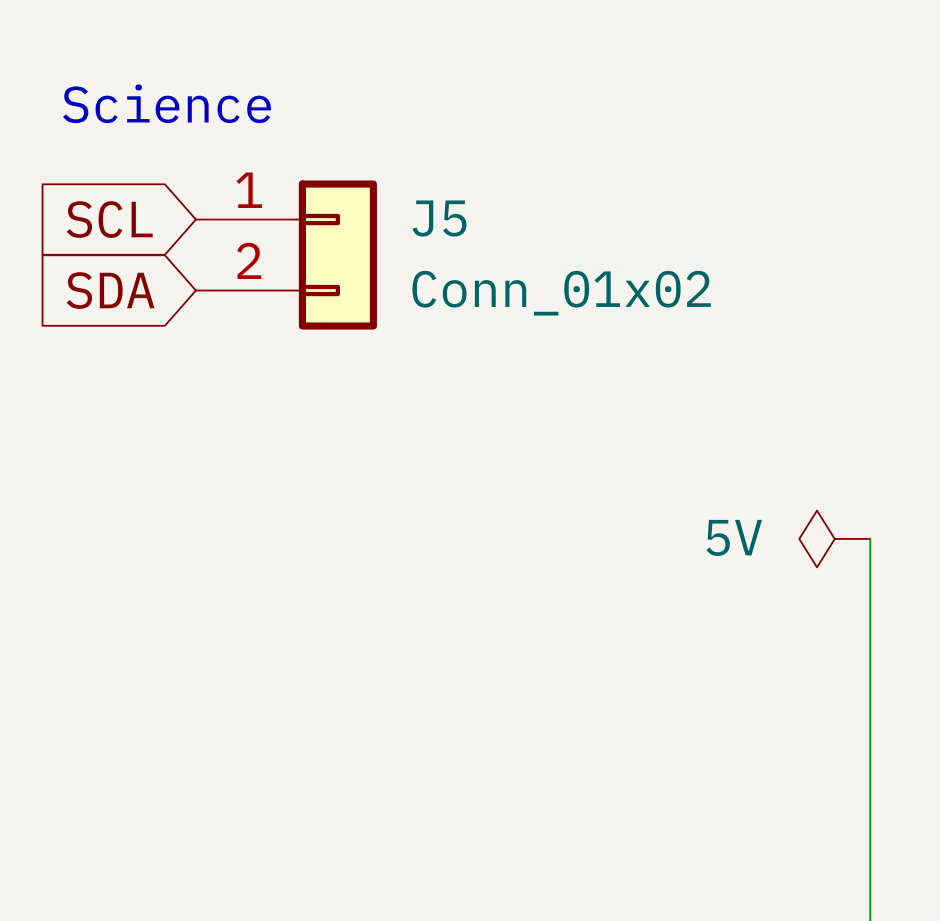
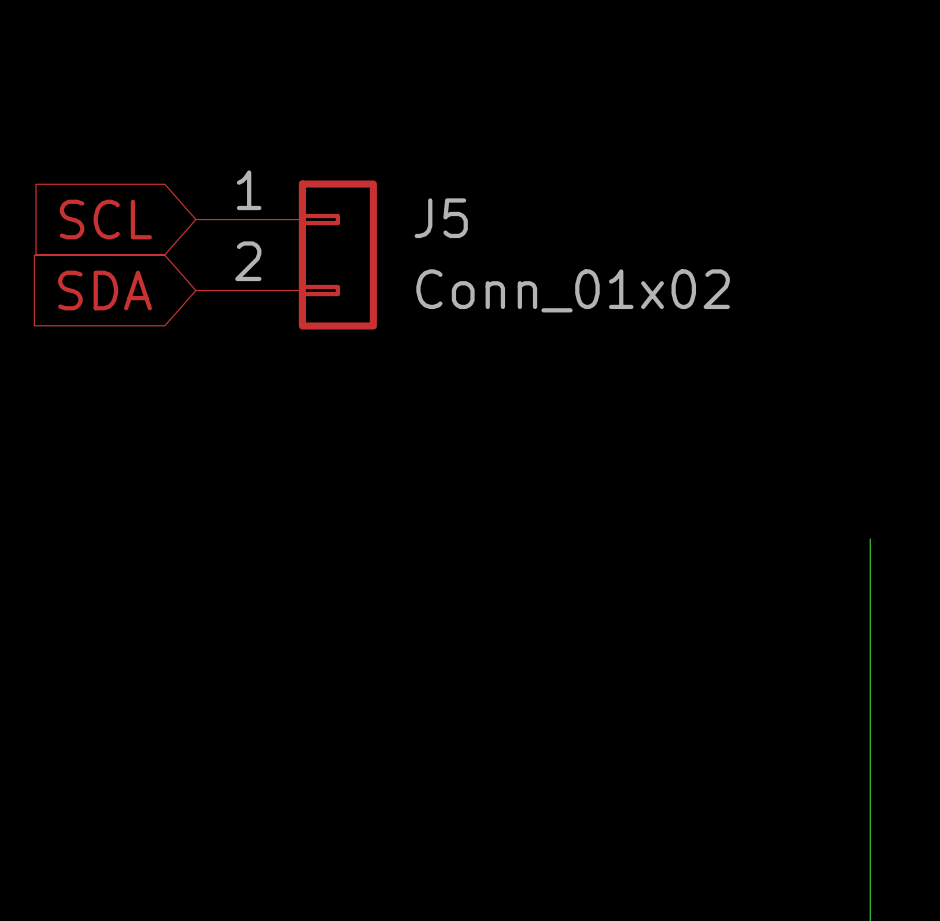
text: Science (166, 103) -> none
power symbol: 5V (834, 538) -> none

